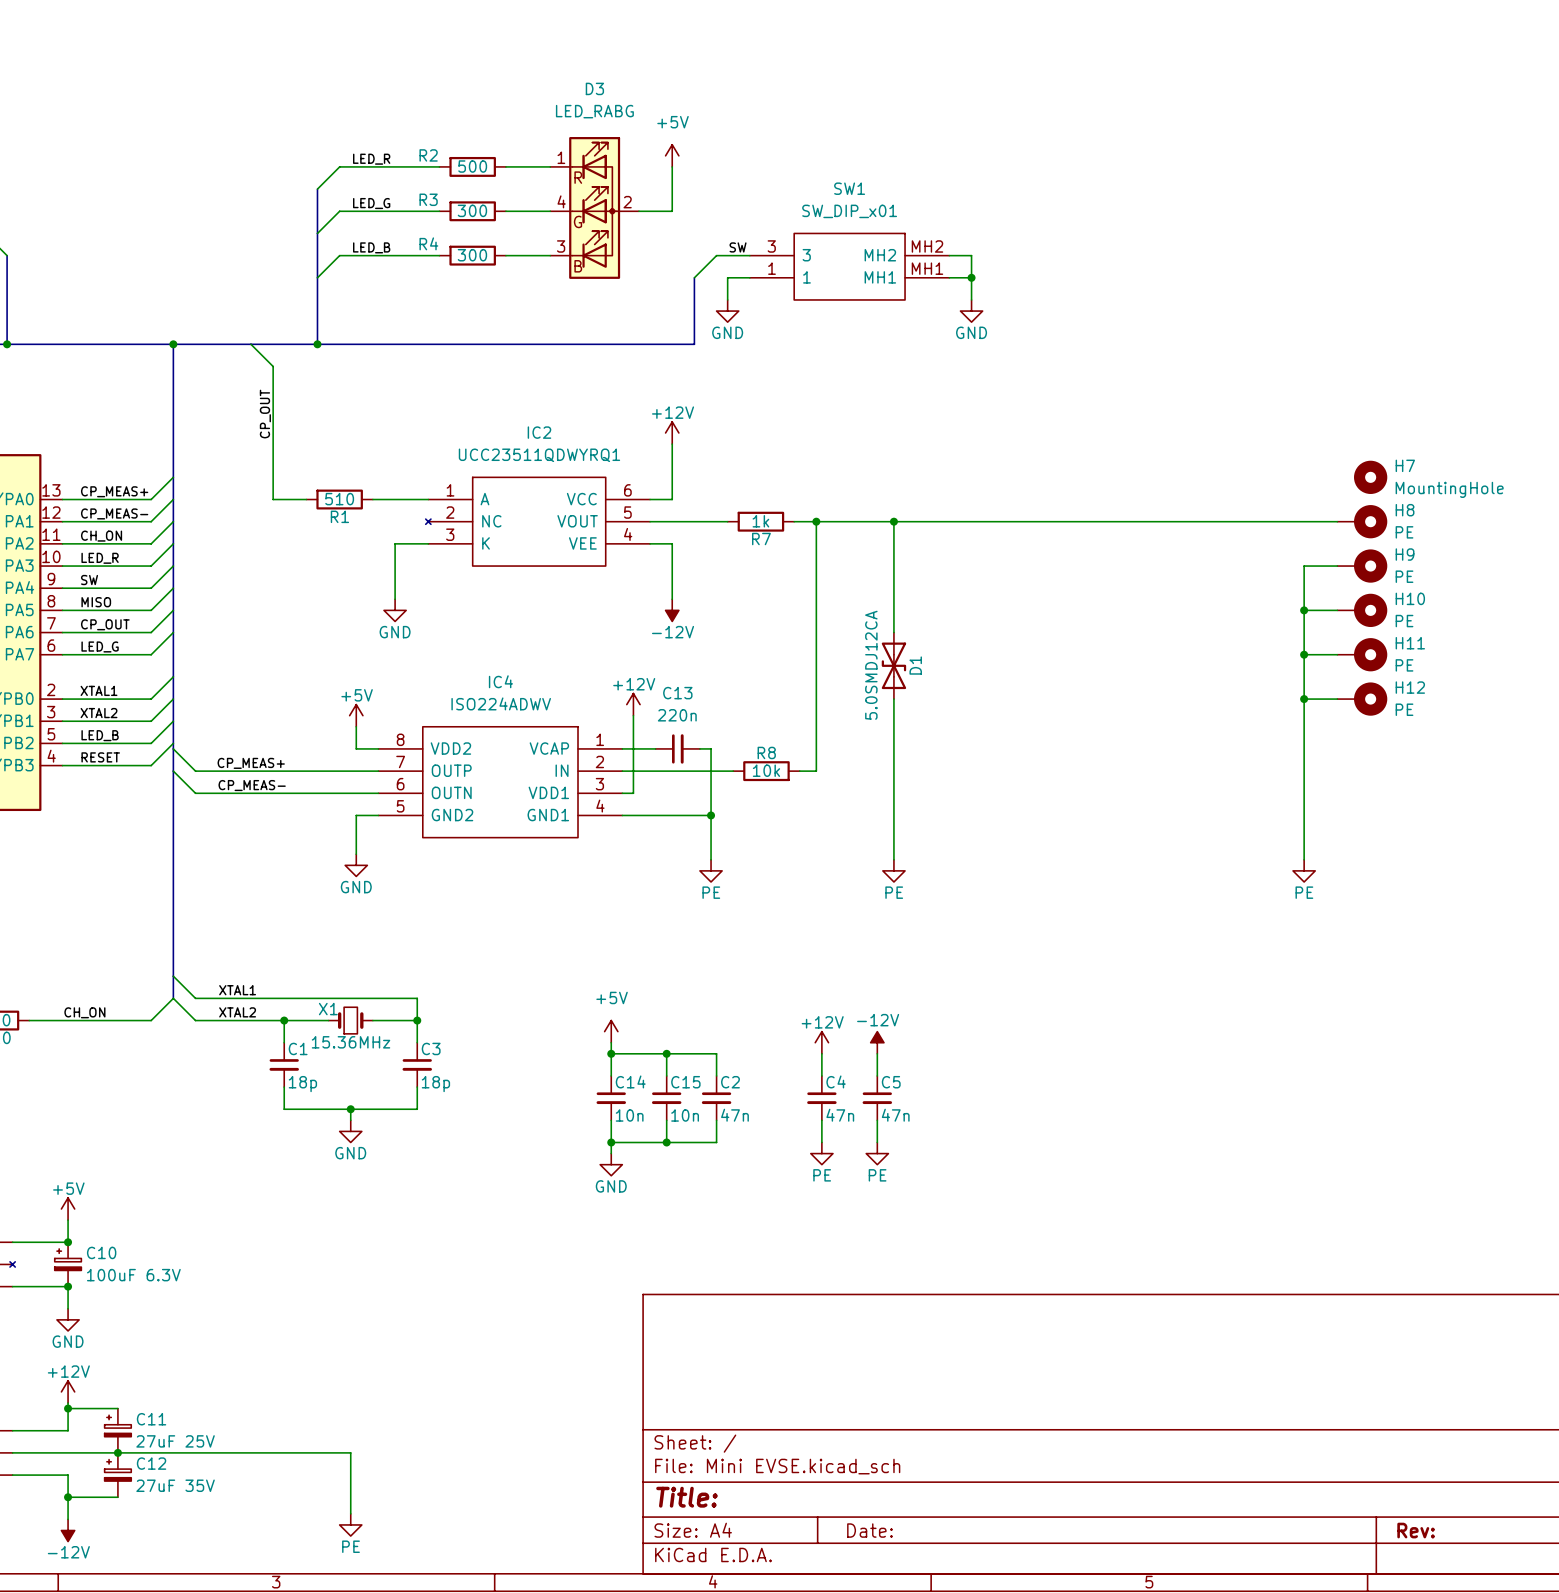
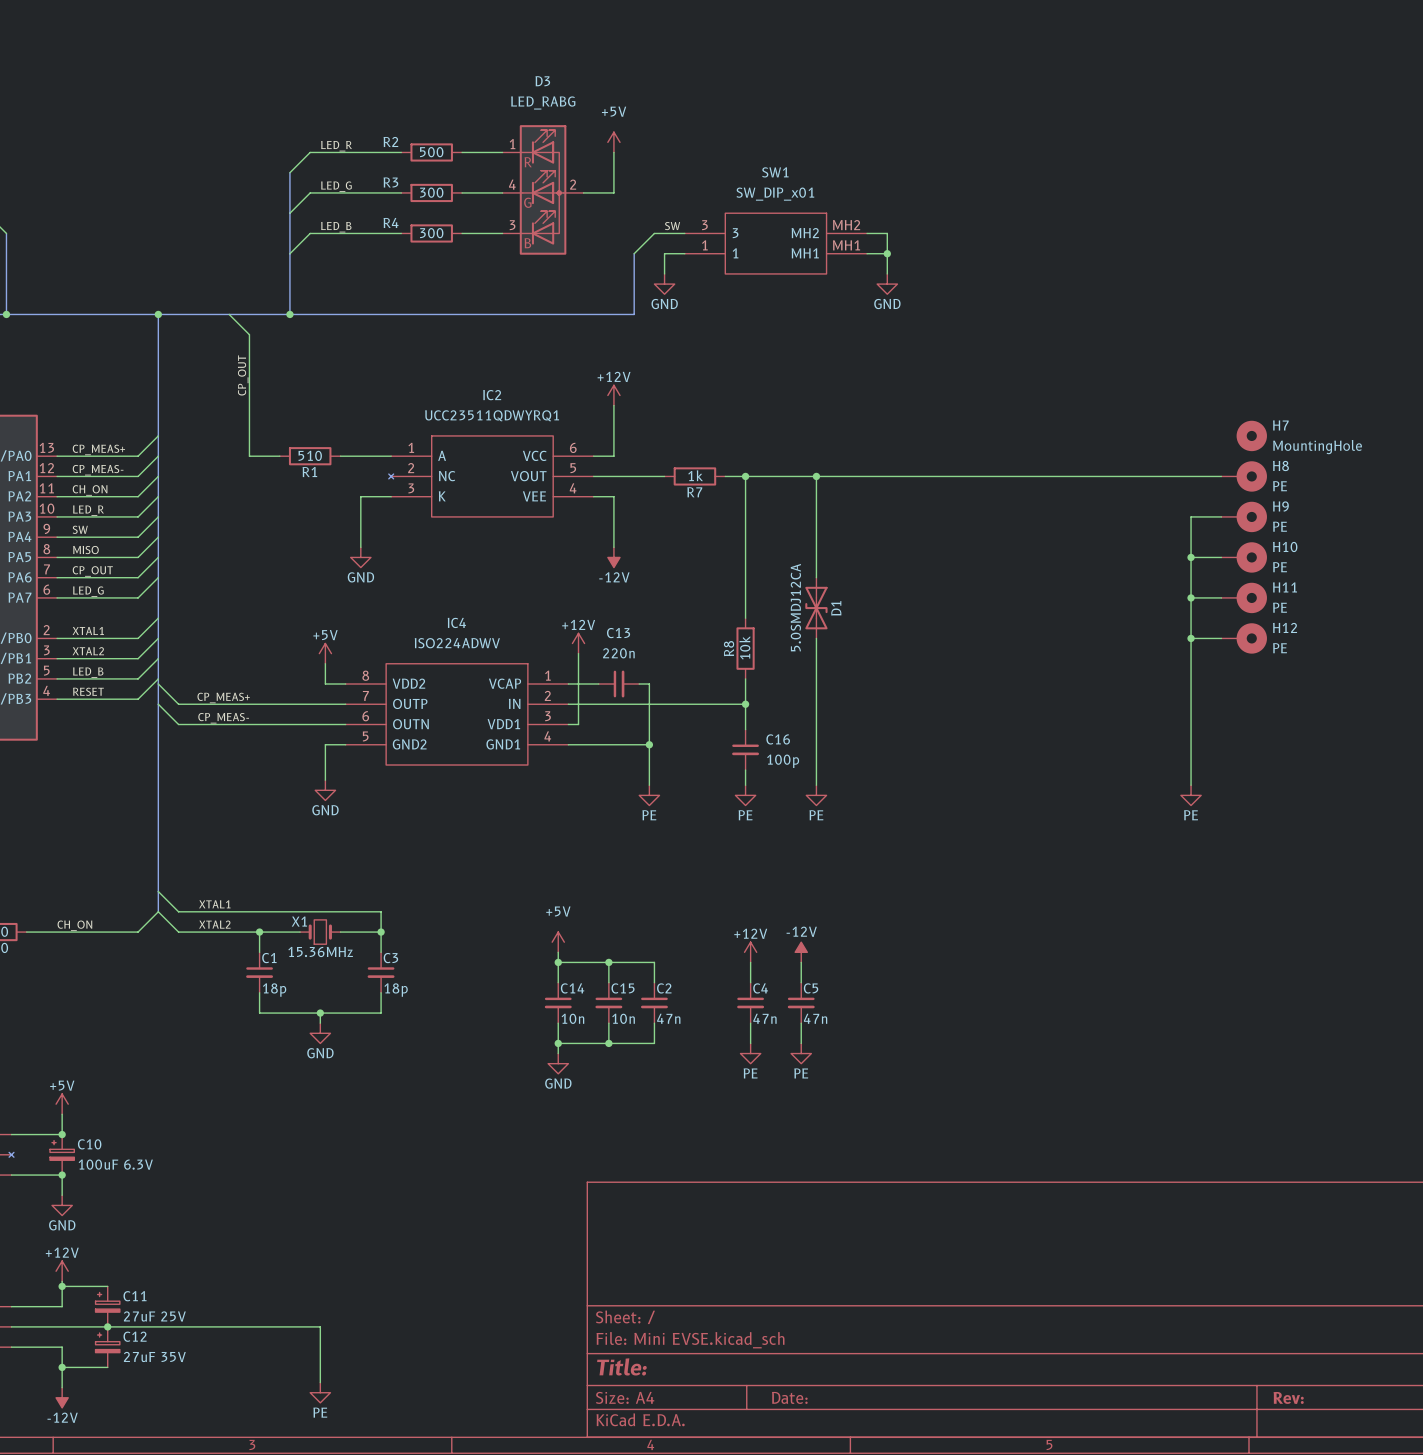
wire: (816, 676) (816, 743) -> none
R8 name position: R8 (766, 752) -> R8 (729, 648)
wire: none -> (669, 704) (730, 704)
R8 rotation: 0° (766, 771) -> 90° clockwise (745, 648)
R8 position: (766, 771) -> (745, 648)
wire: none -> (745, 704) (745, 729)
junction: none -> (745, 704)
C16: none -> 100p (745, 749)
wire: none -> (745, 770) (745, 785)
power symbol: none -> PE (745, 795)

